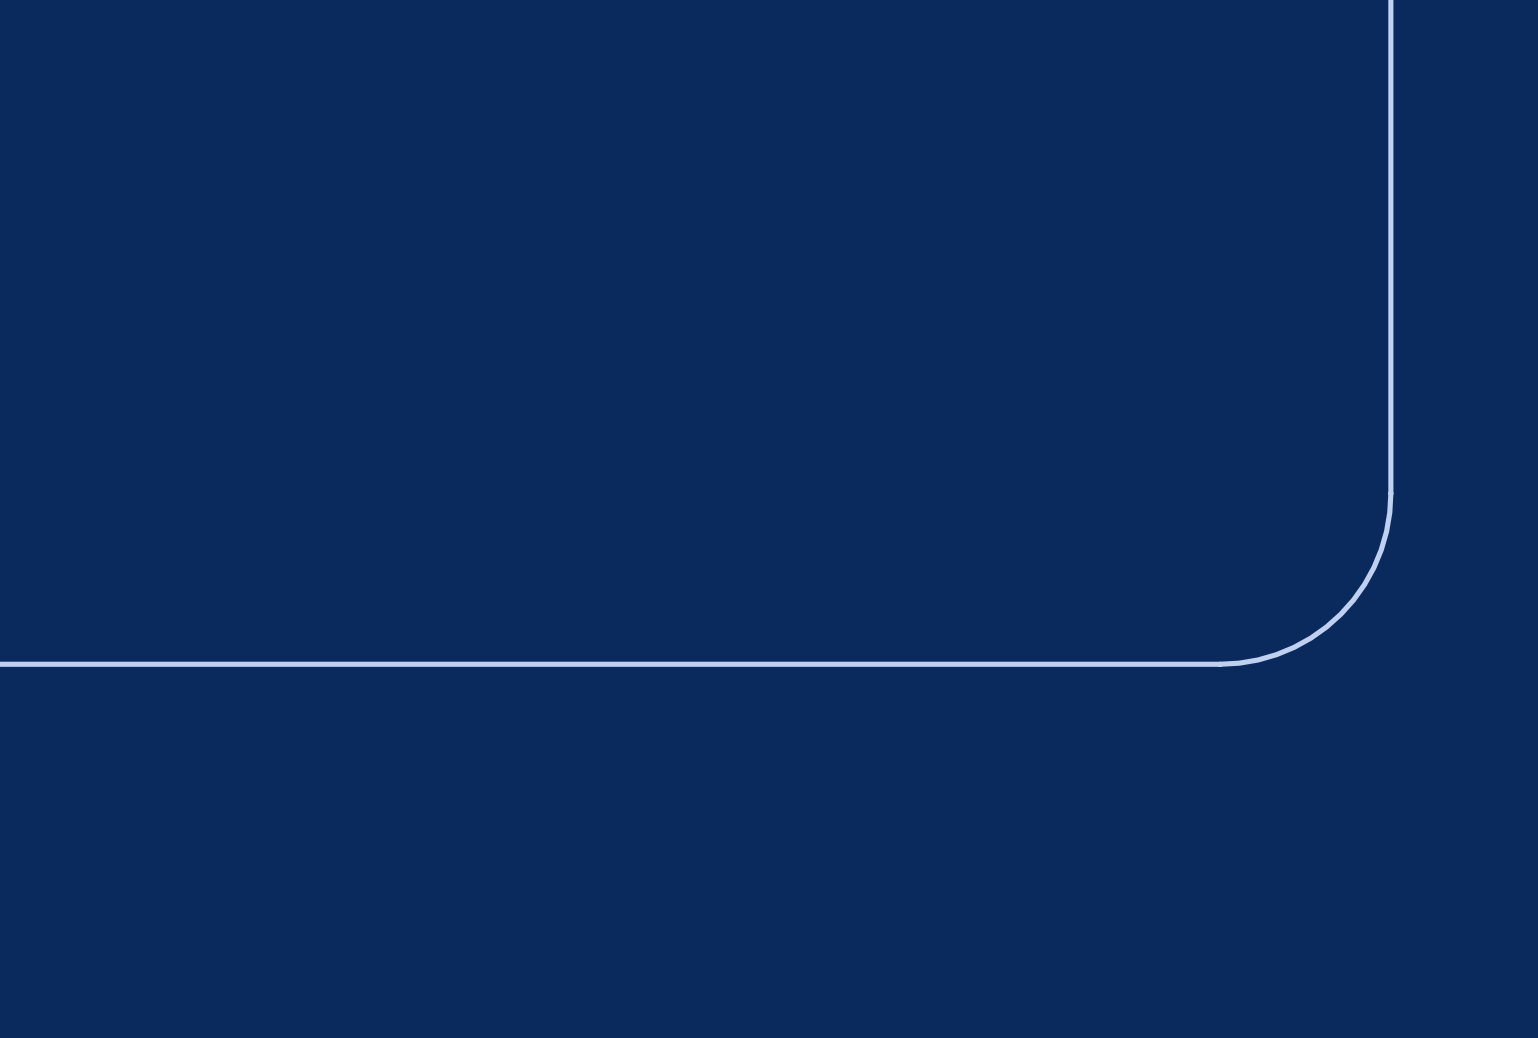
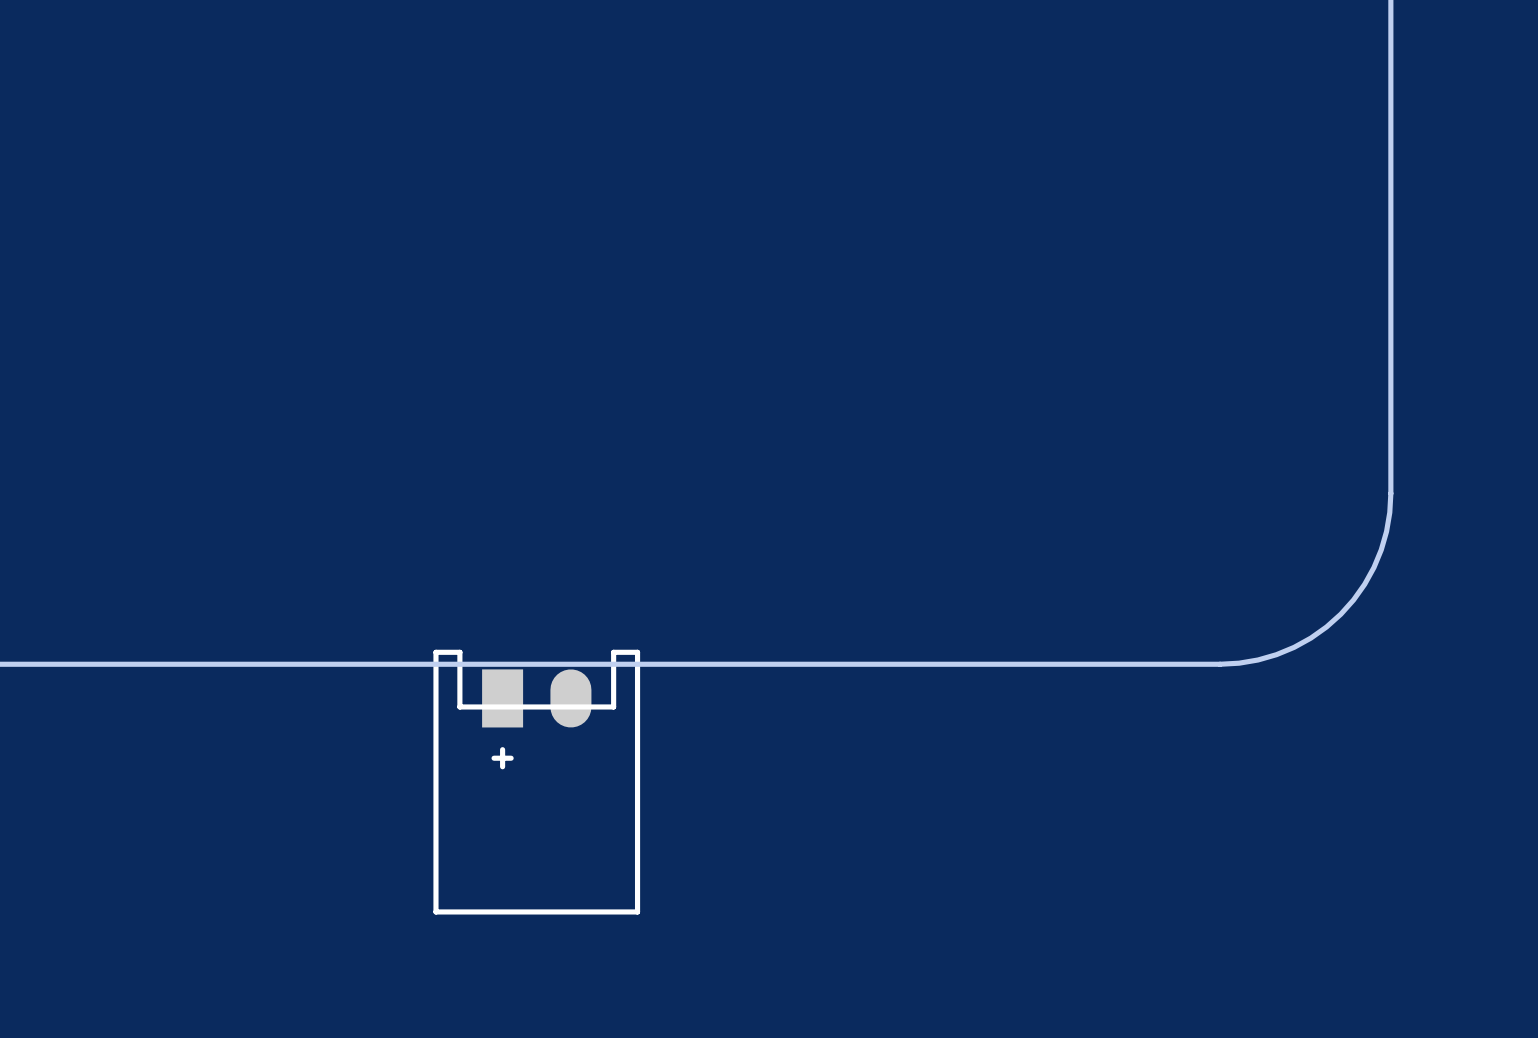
part: none -> (536, 782)

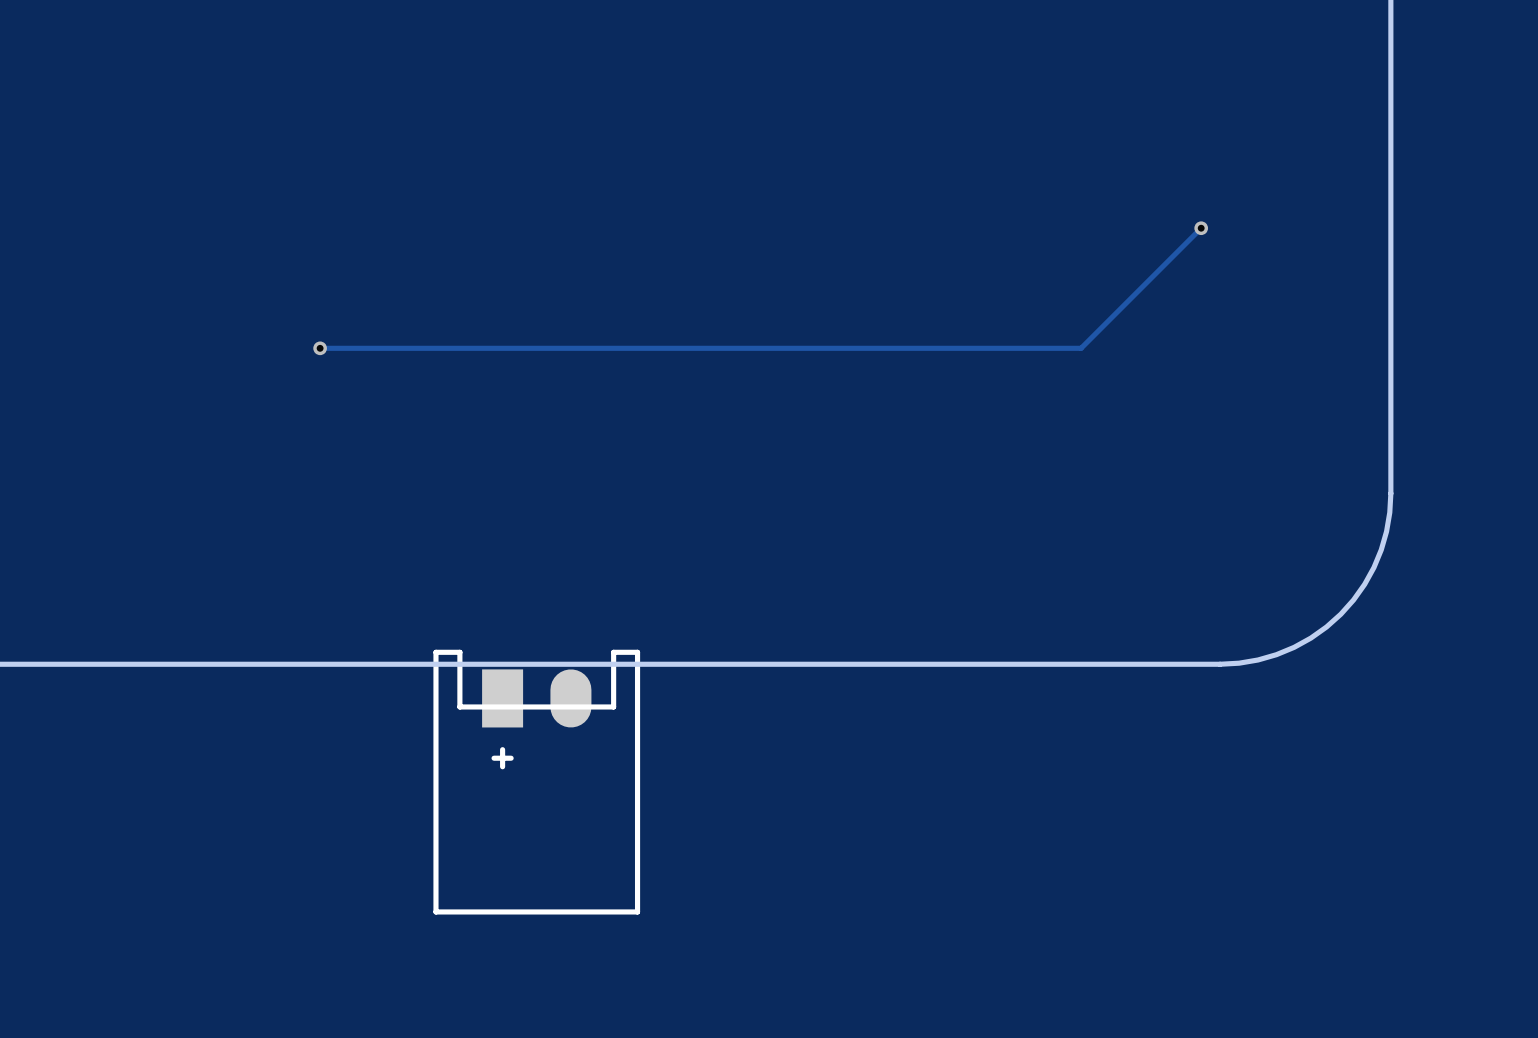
track: none -> (1201, 228) (1081, 348) (320, 348)
via: none -> (1201, 228)
via: none -> (320, 348)

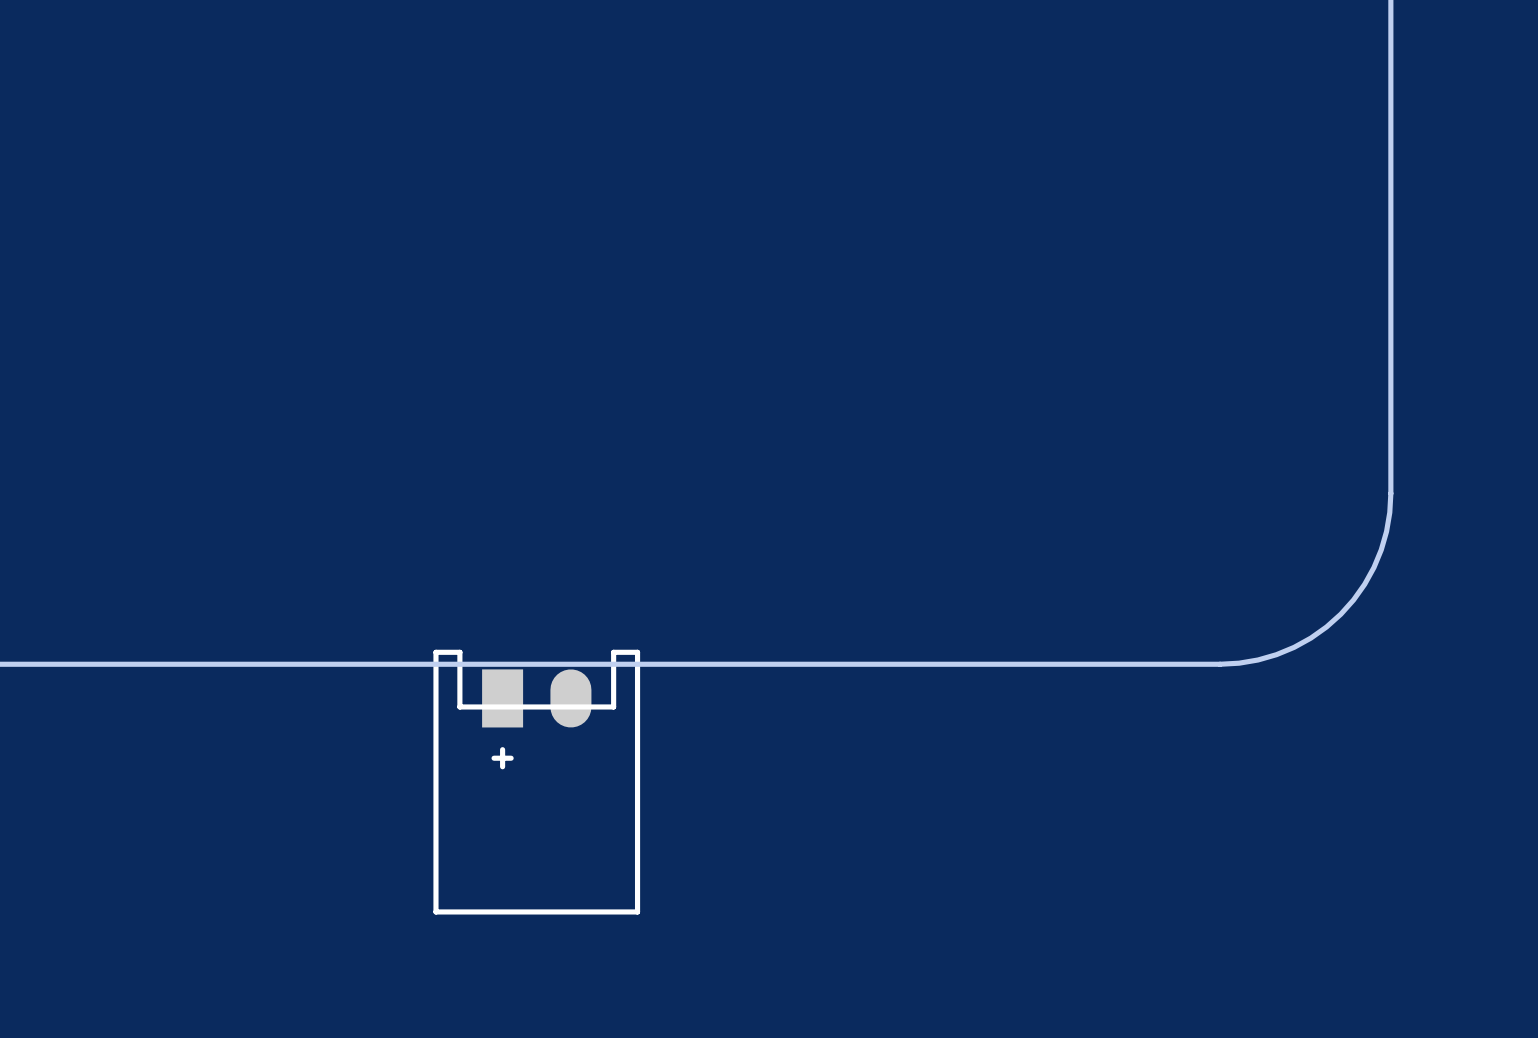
track: (1201, 228) (1081, 348) (320, 348) -> none
via: (1201, 228) -> none
via: (320, 348) -> none

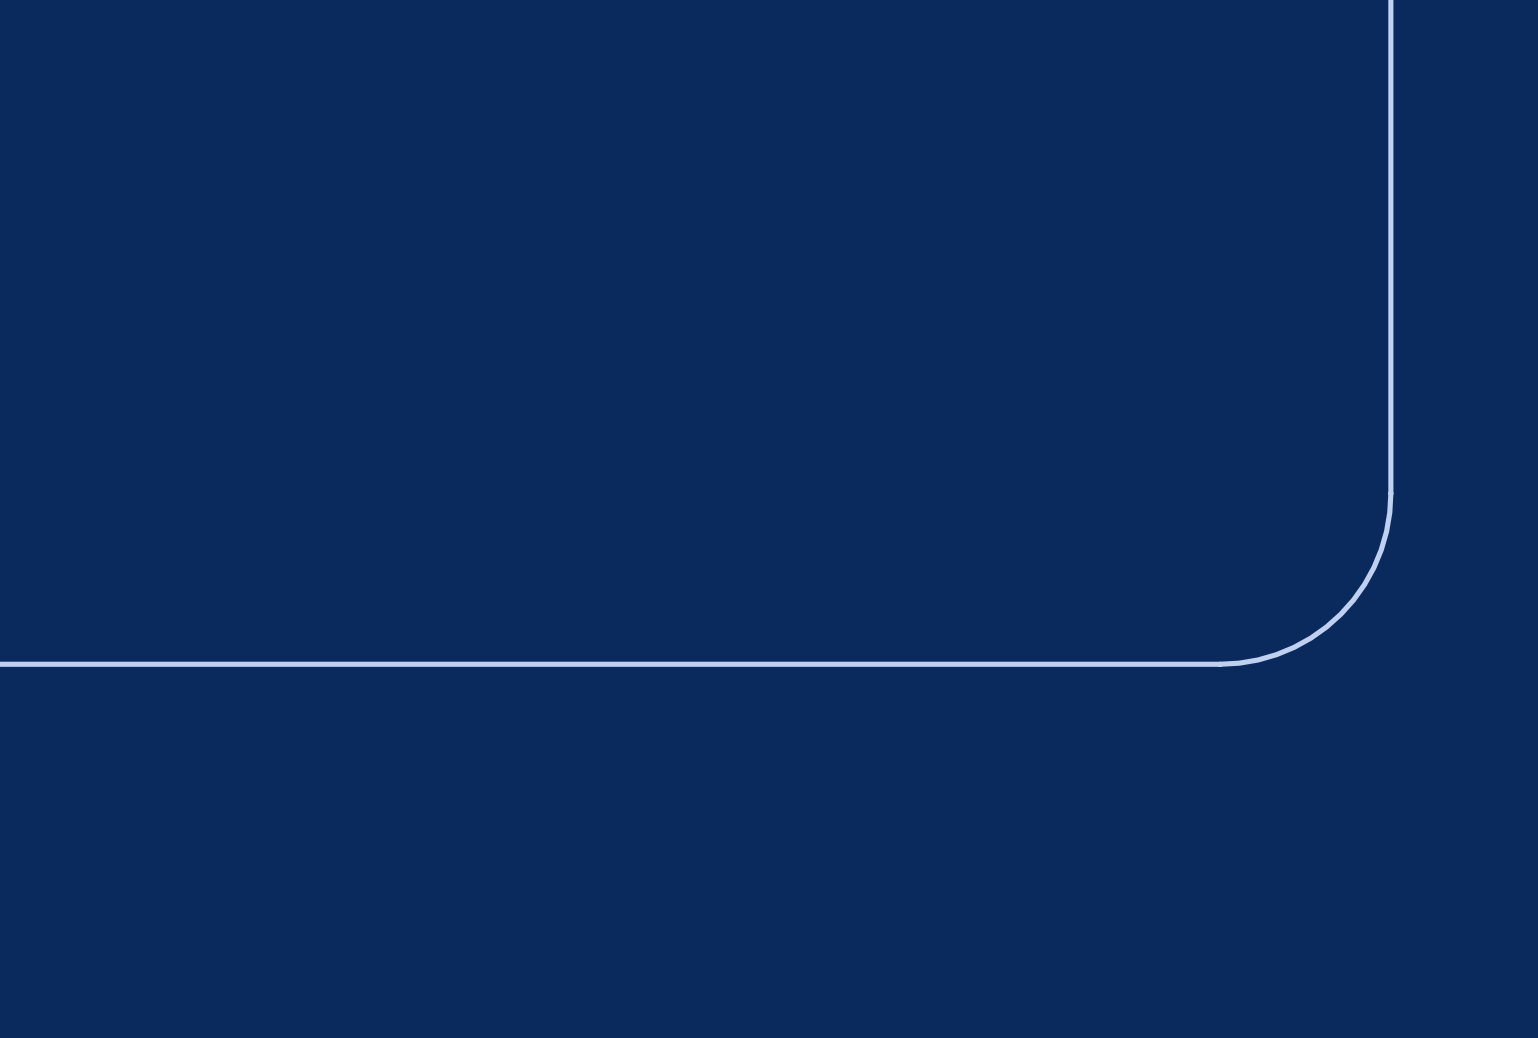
part: (536, 782) -> none

